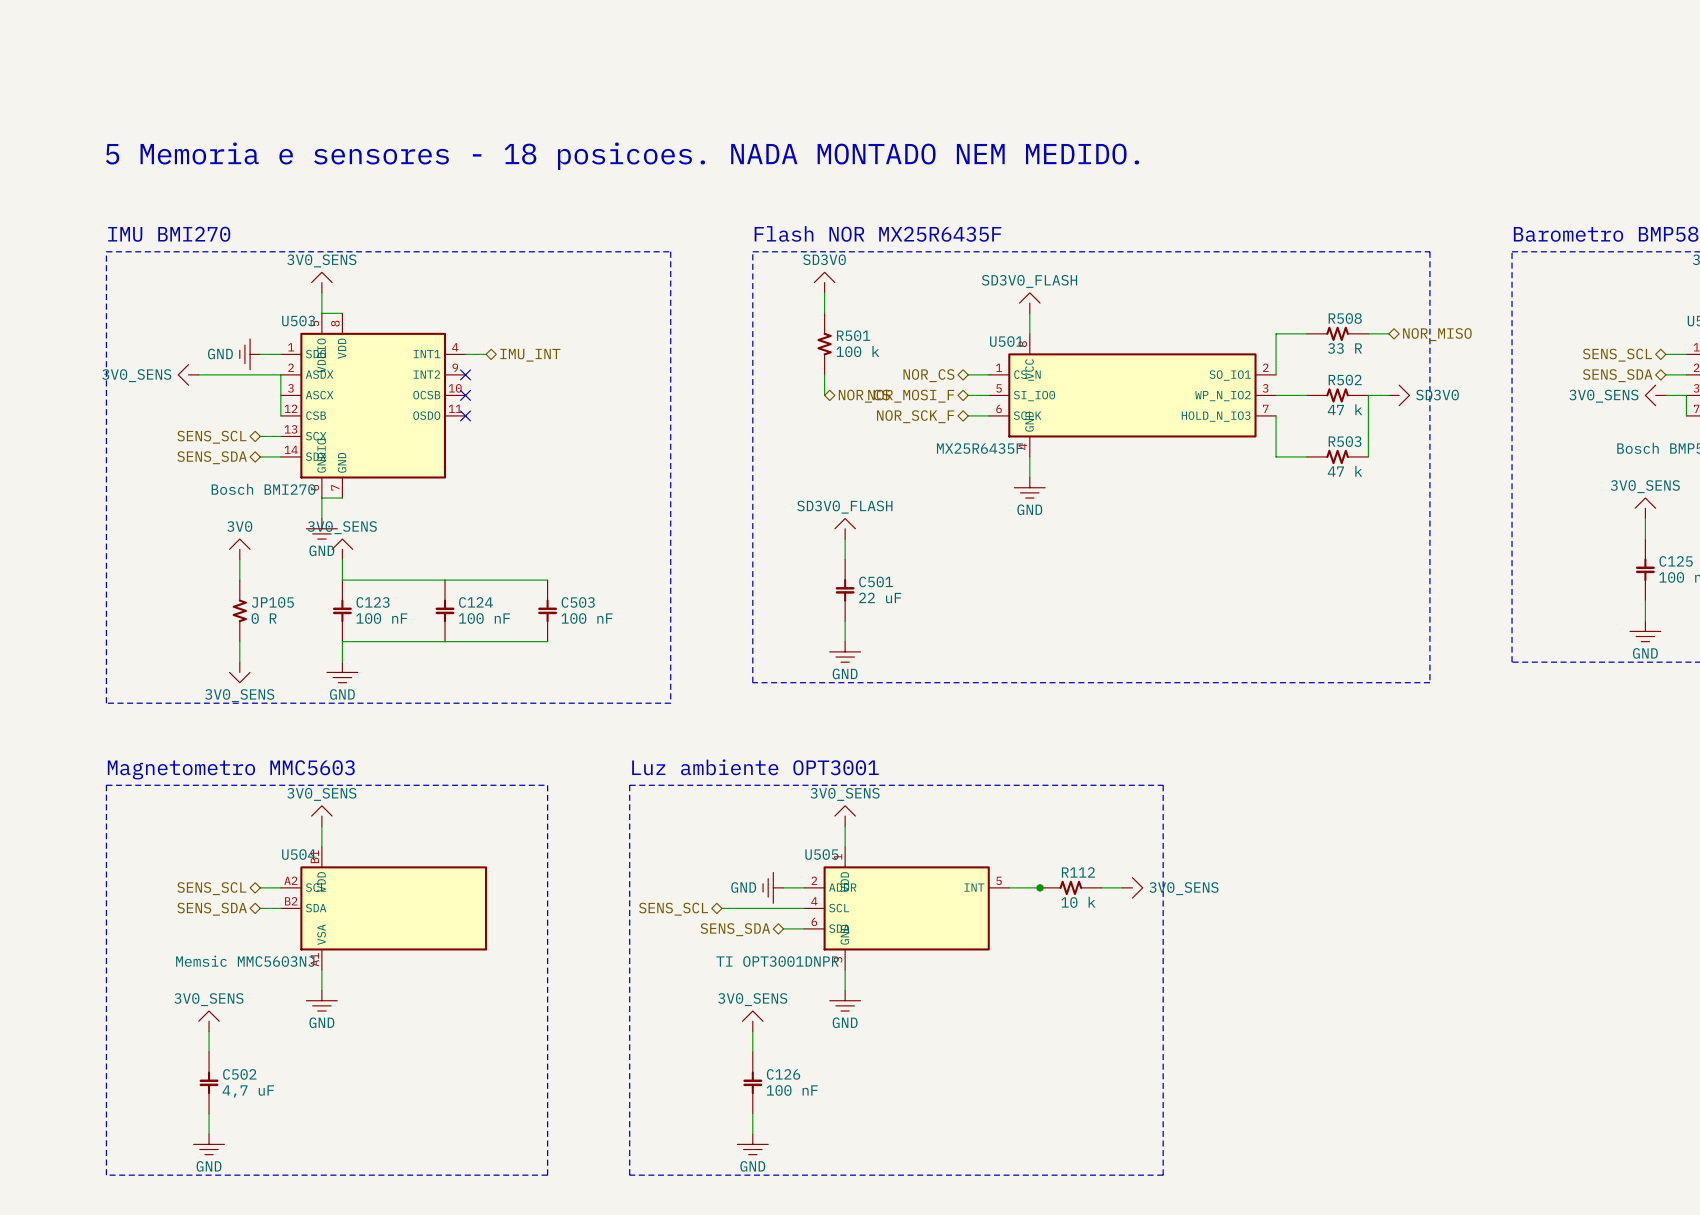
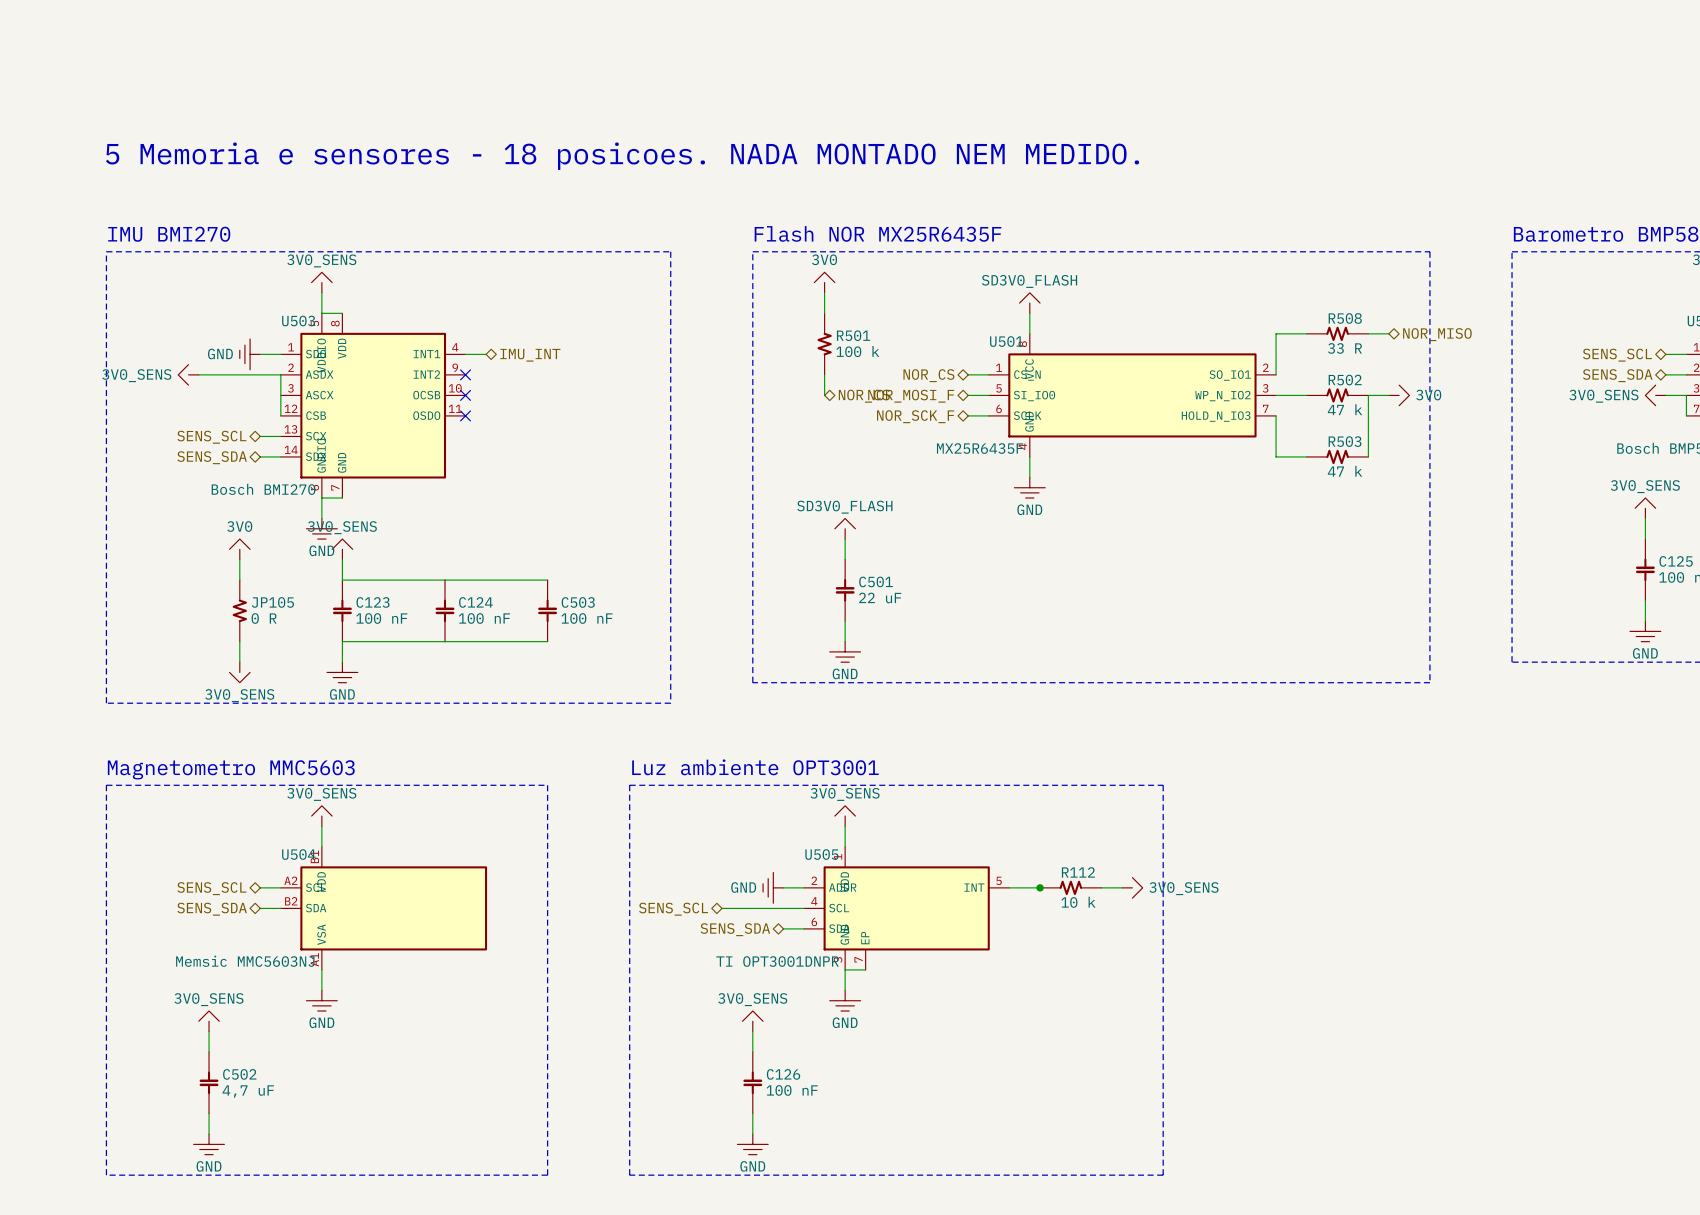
power symbol: SD3V0 (824, 282) -> 3V0 (824, 282)
power symbol: SD3V0 (1399, 395) -> 3V0 (1399, 395)
U505 symbol: [804, 846, 1010, 970] -> [804, 846, 1010, 970]
wire: none -> (845, 969) (865, 969)

